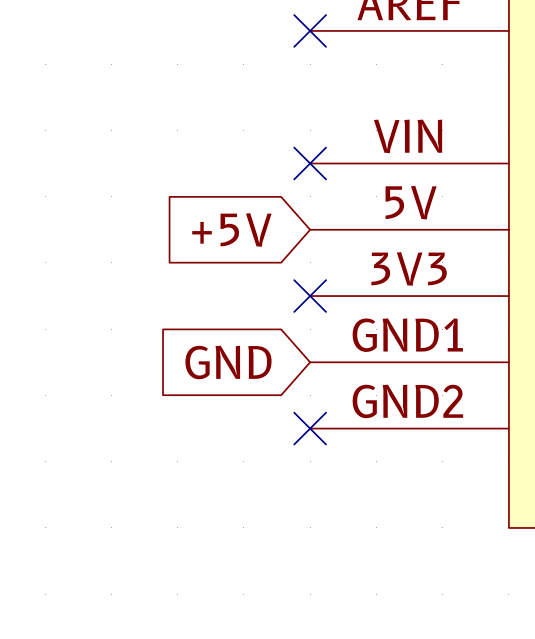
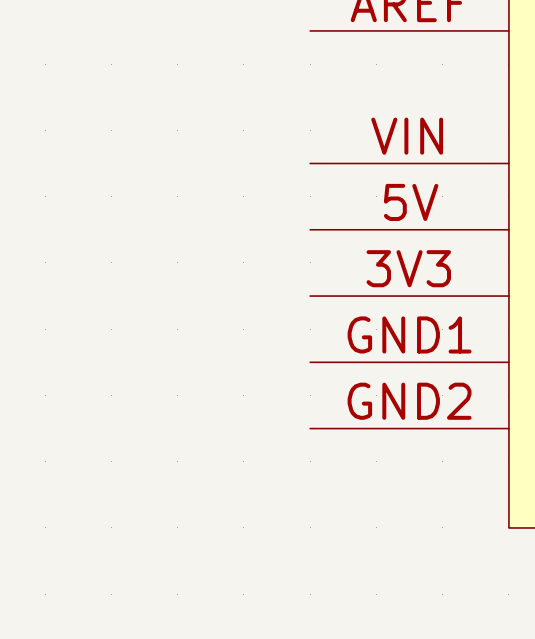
no-connect mark: (310, 30) -> none
no-connect mark: (310, 163) -> none
global label: +5V (231, 229) -> none
no-connect mark: (310, 296) -> none
global label: GND (228, 362) -> none
no-connect mark: (310, 428) -> none

